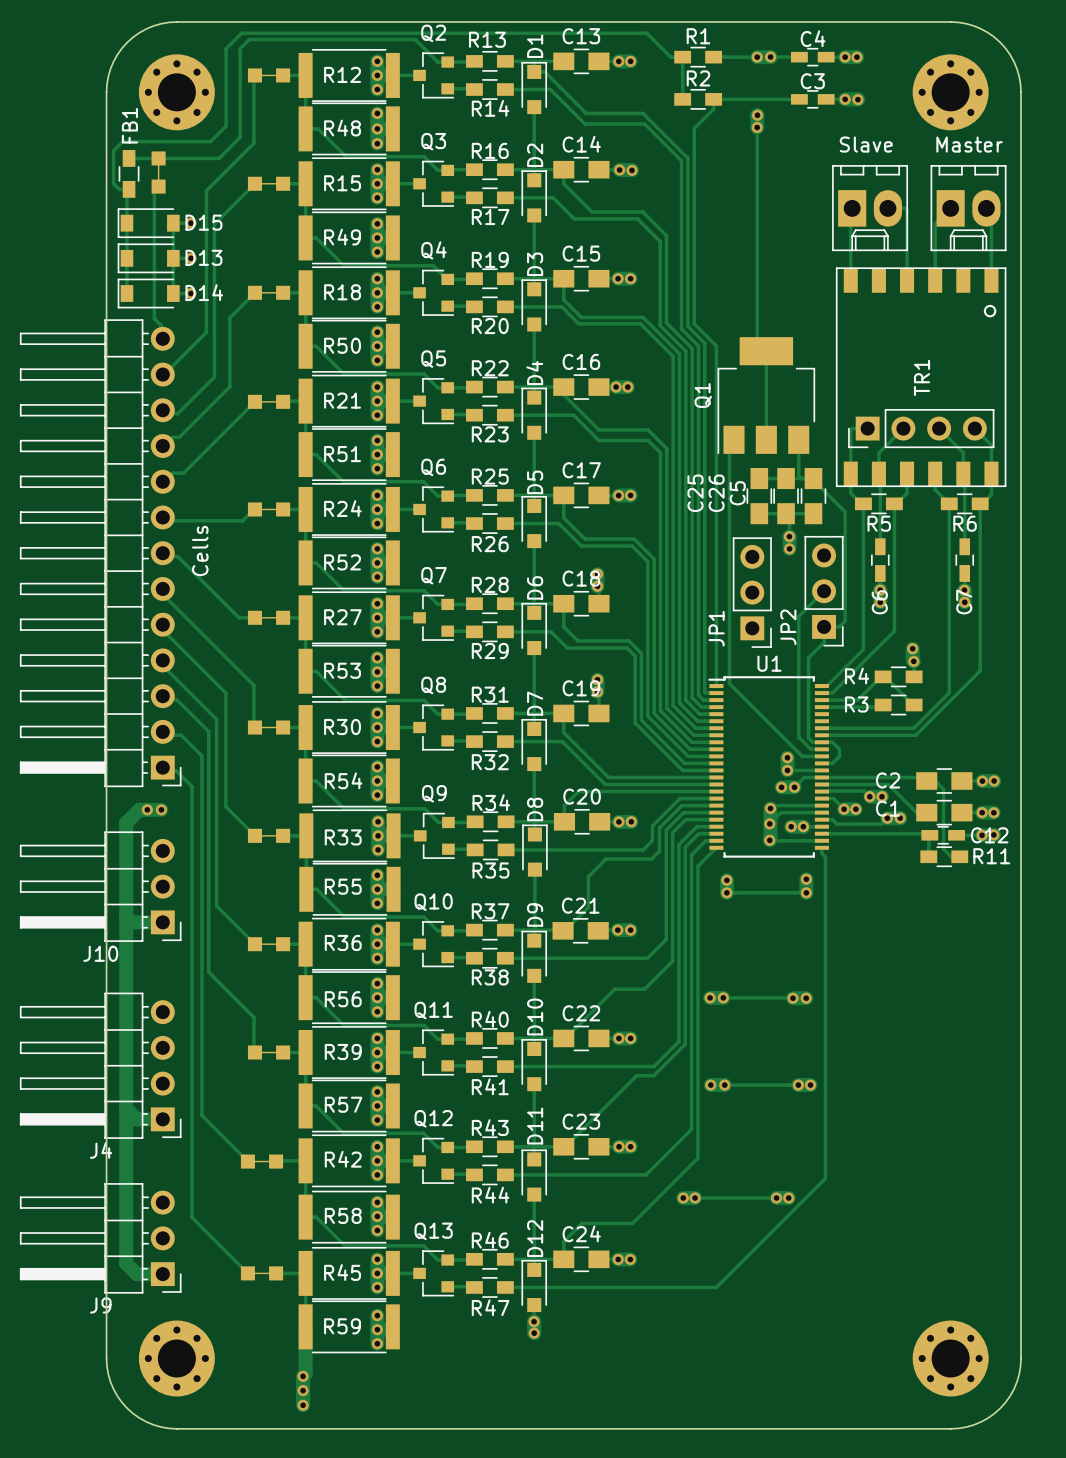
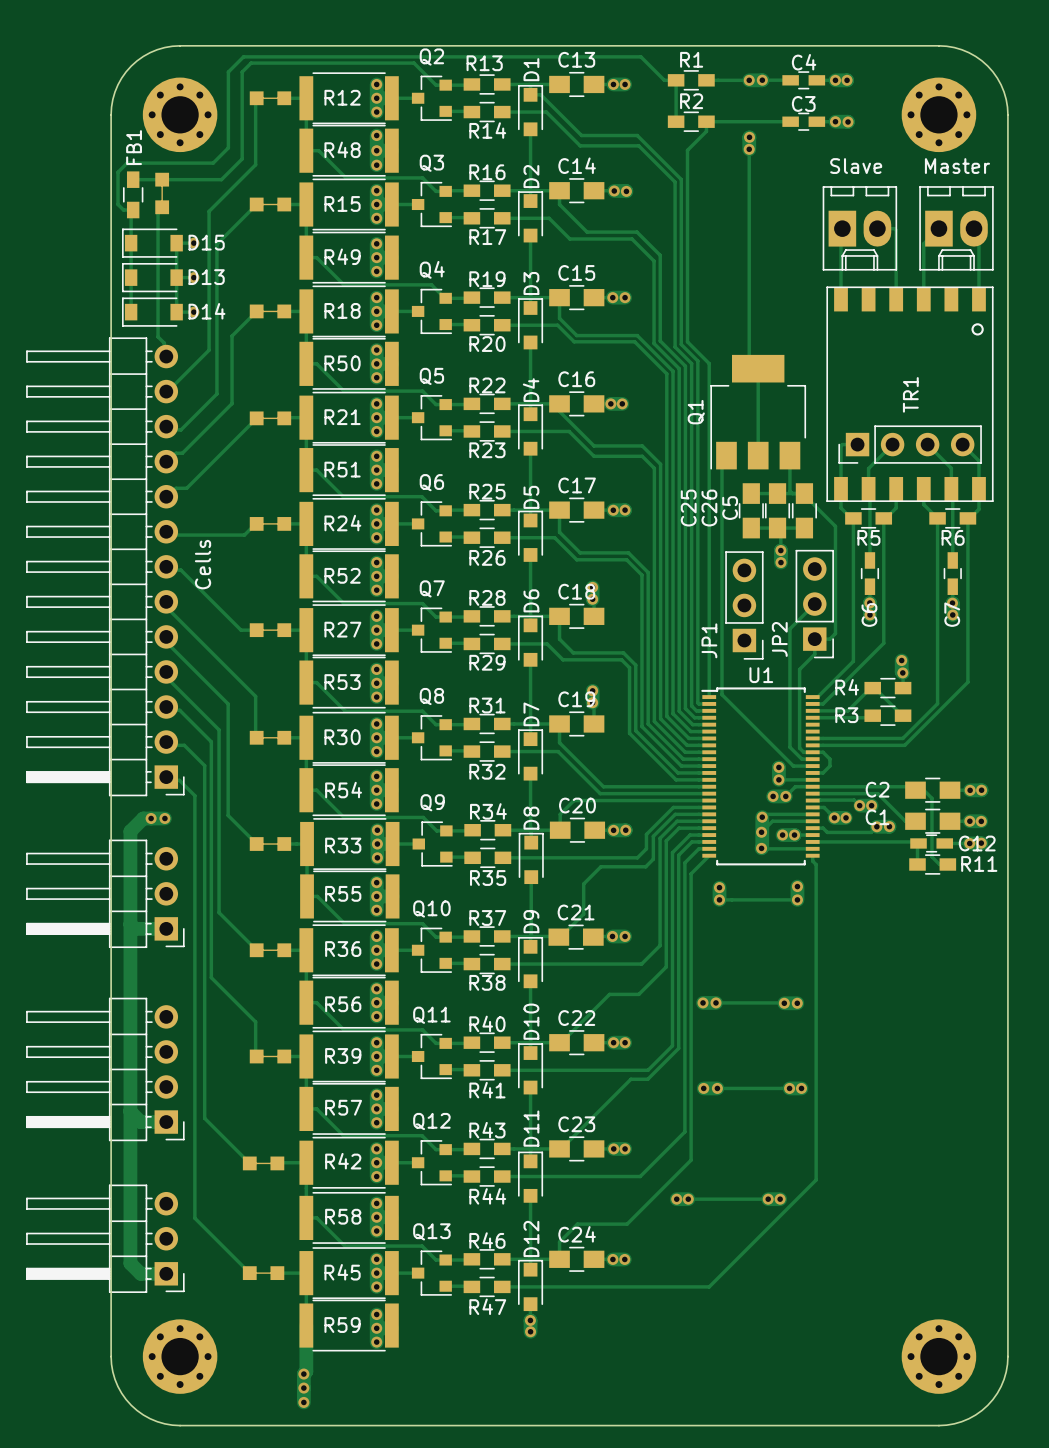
J10 name: J10 (100, 953) -> none
J4 name: J4 (101, 1150) -> none
J9 name: J9 (100, 1305) -> none

